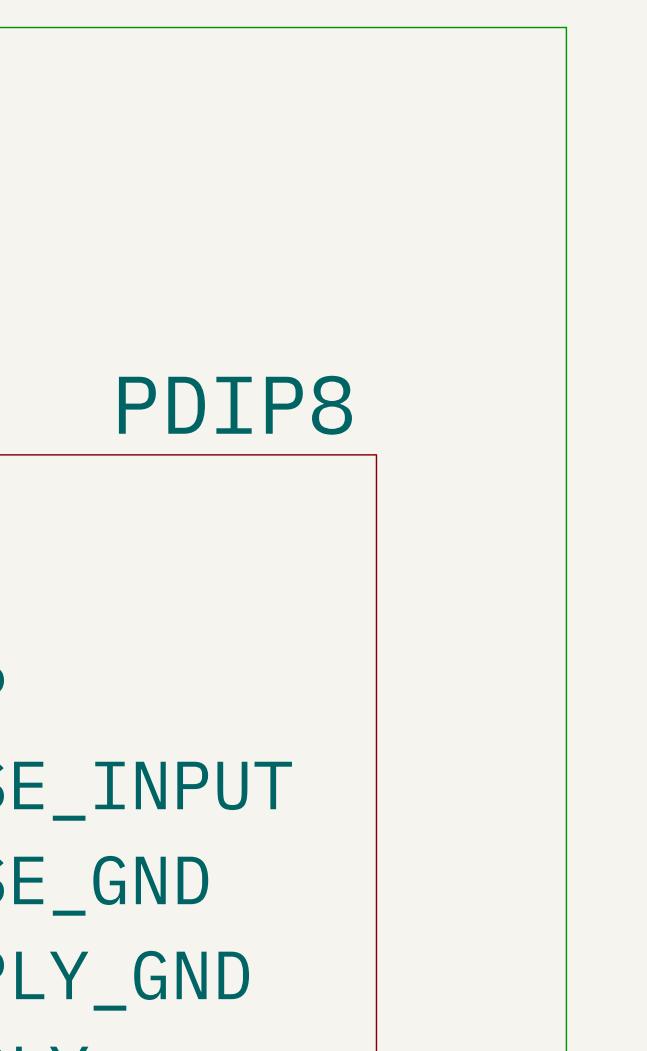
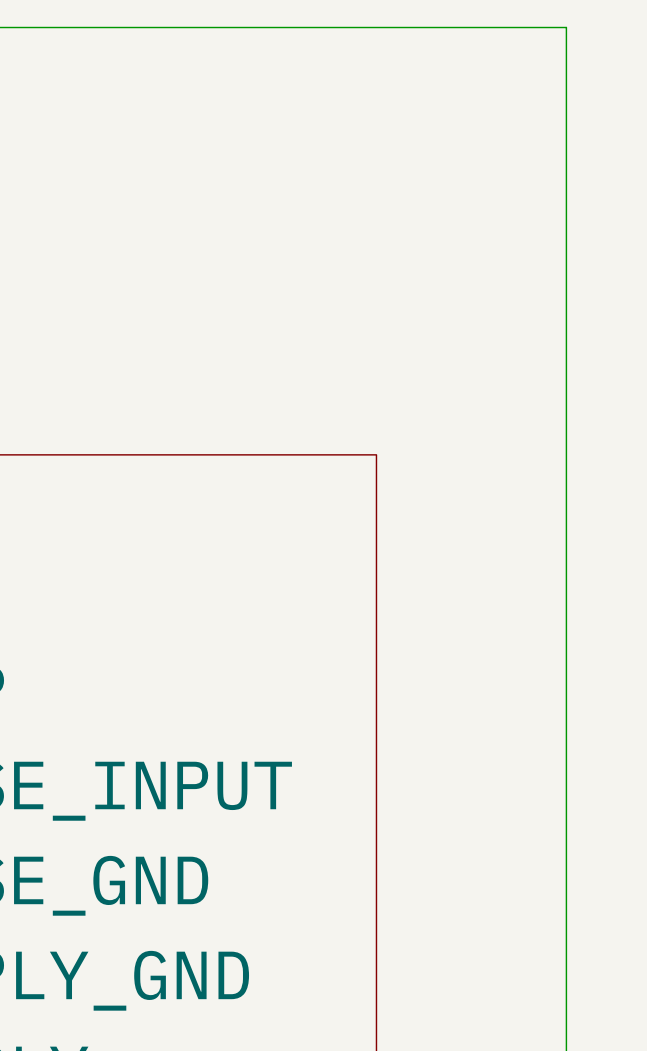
part text: PDIP8 (235, 405) -> none

